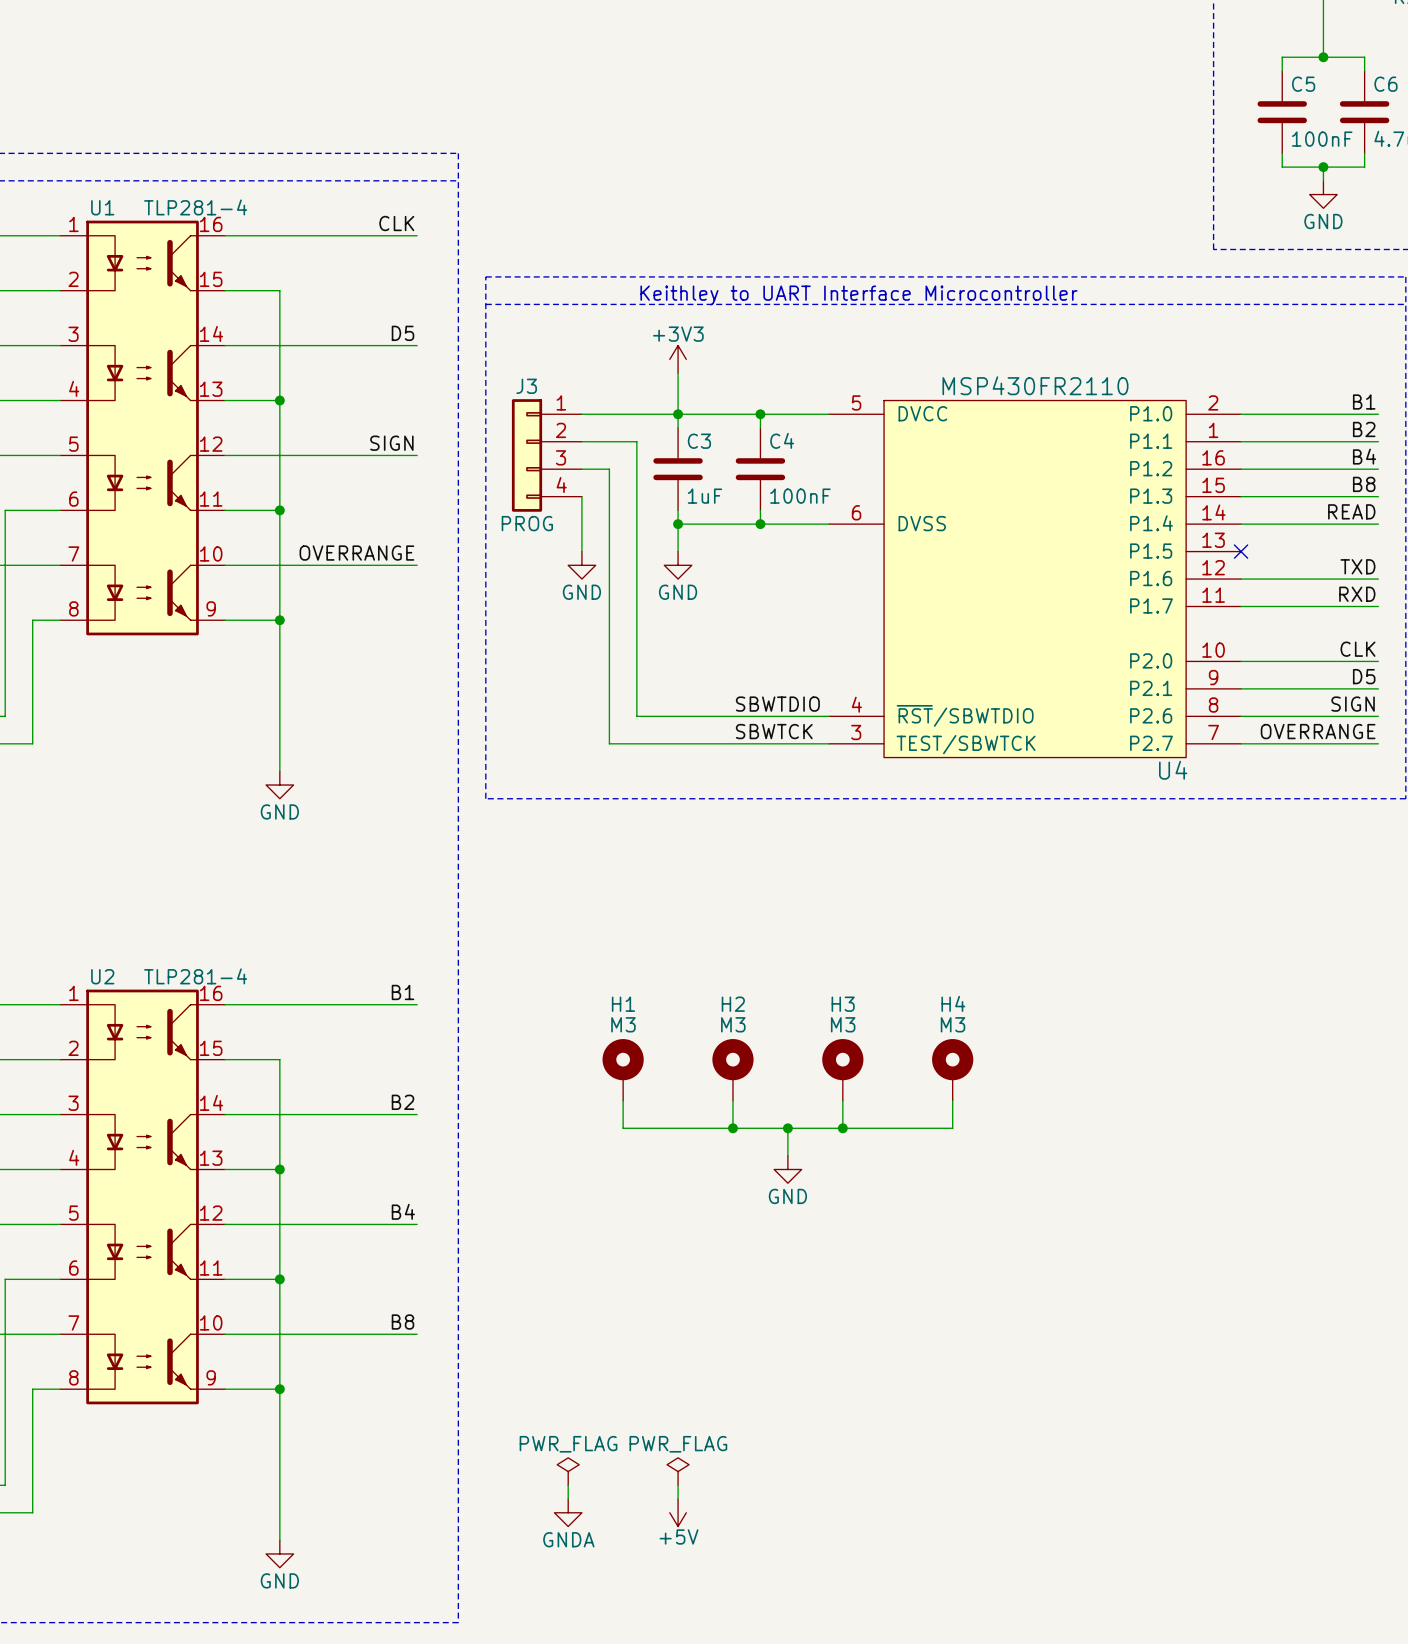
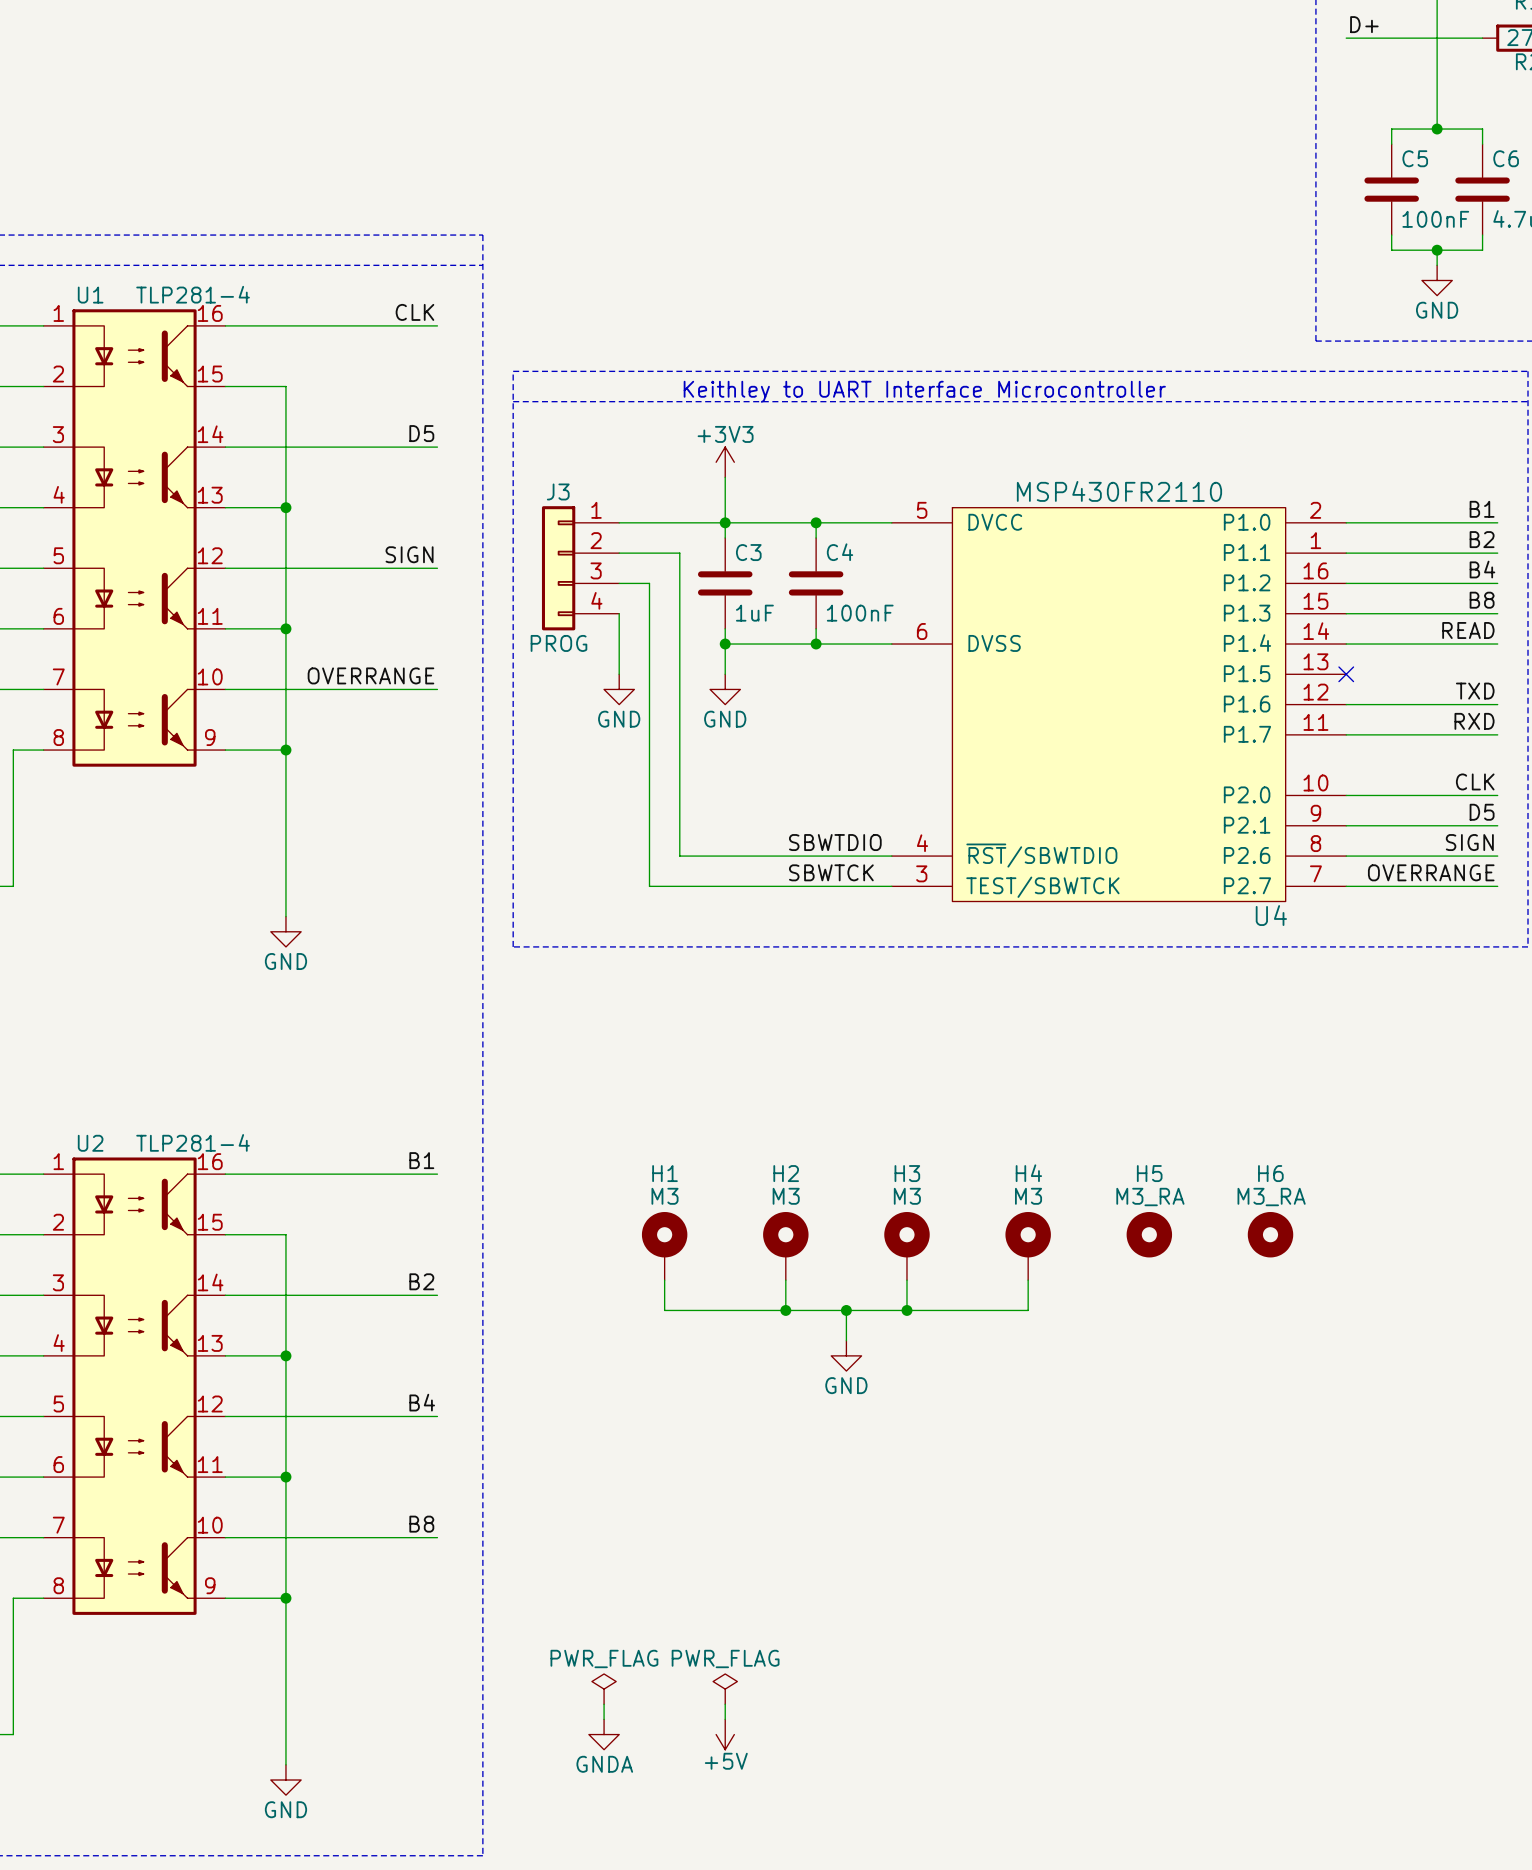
H5: none -> M3_RA (1149, 1234)
H6: none -> M3_RA (1270, 1234)

